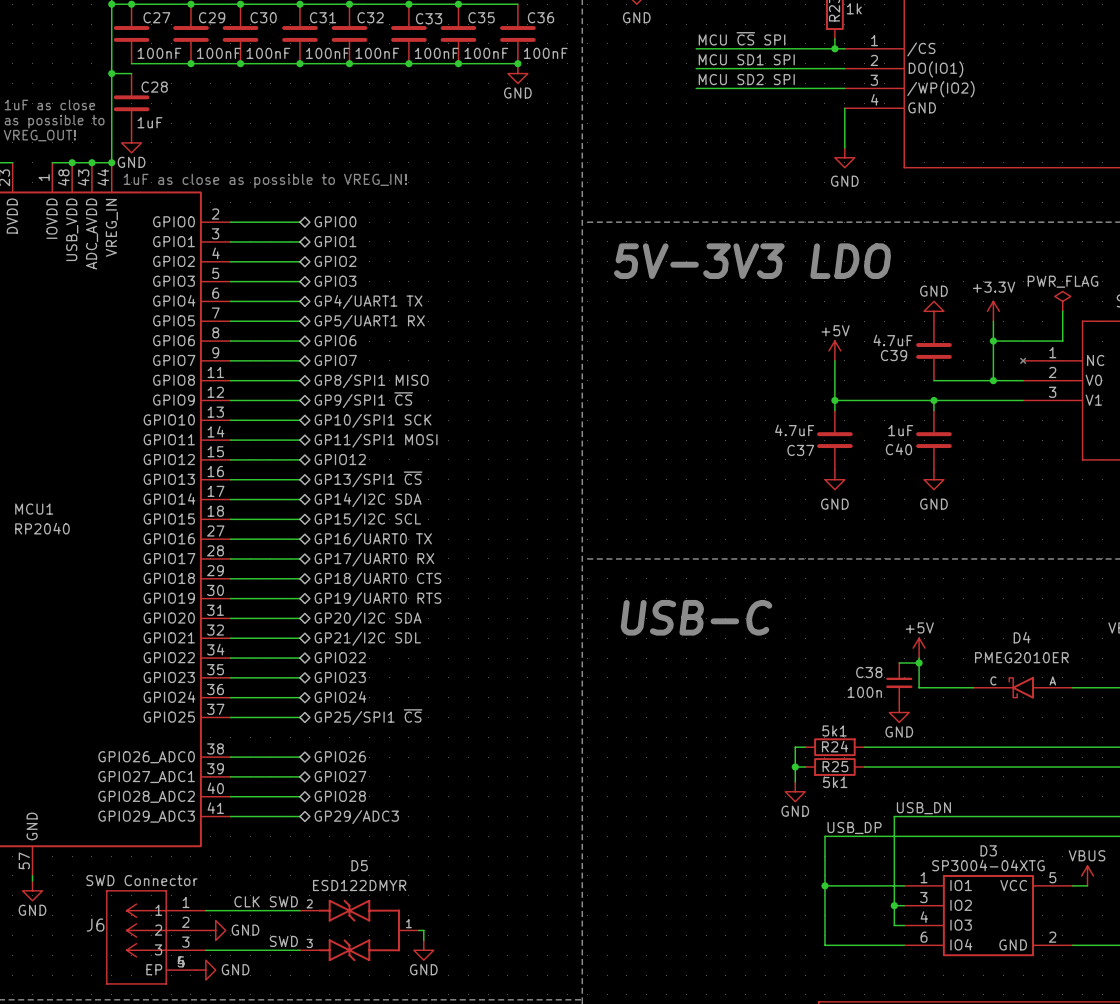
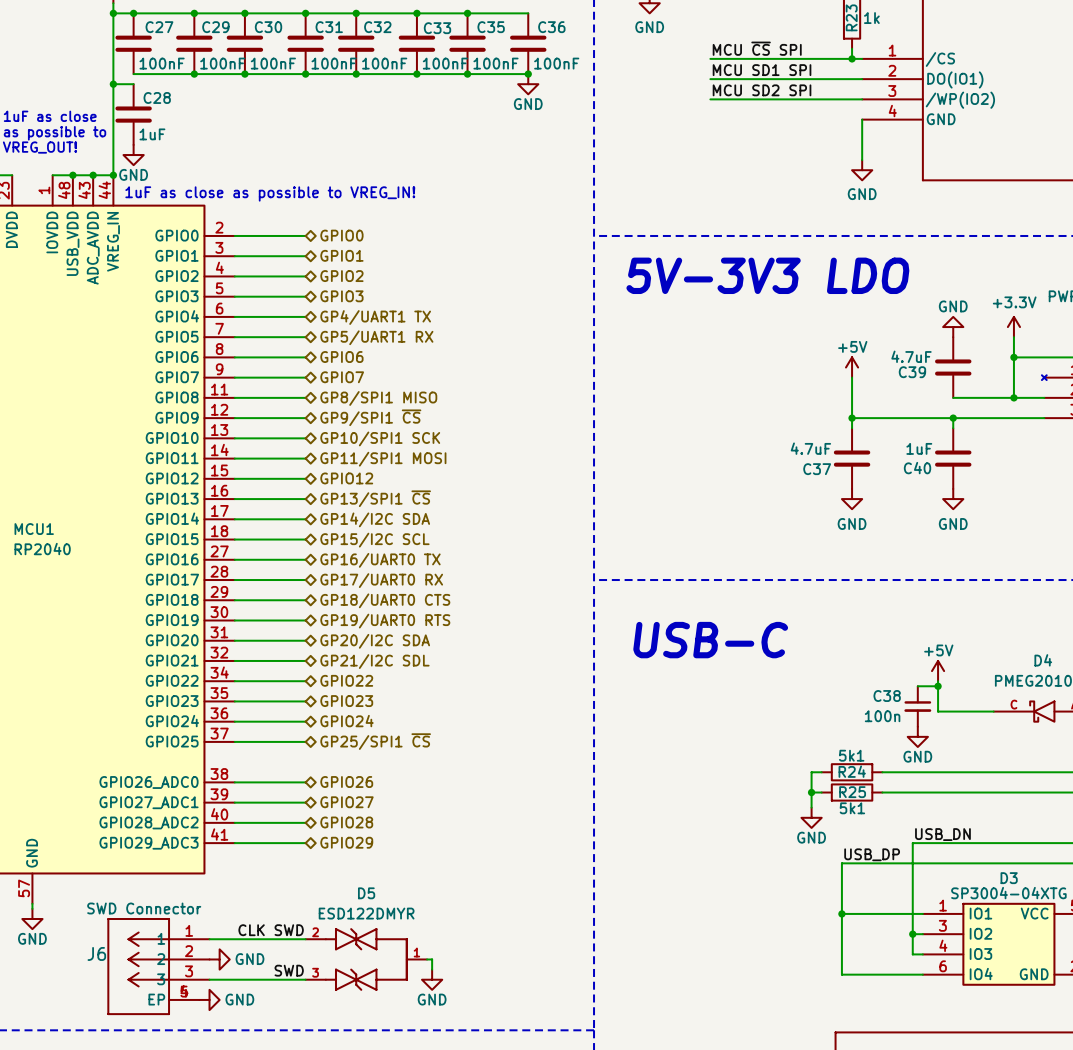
hierarchical label: GP29/ADC3 (356, 817) -> GPIO29 (346, 842)

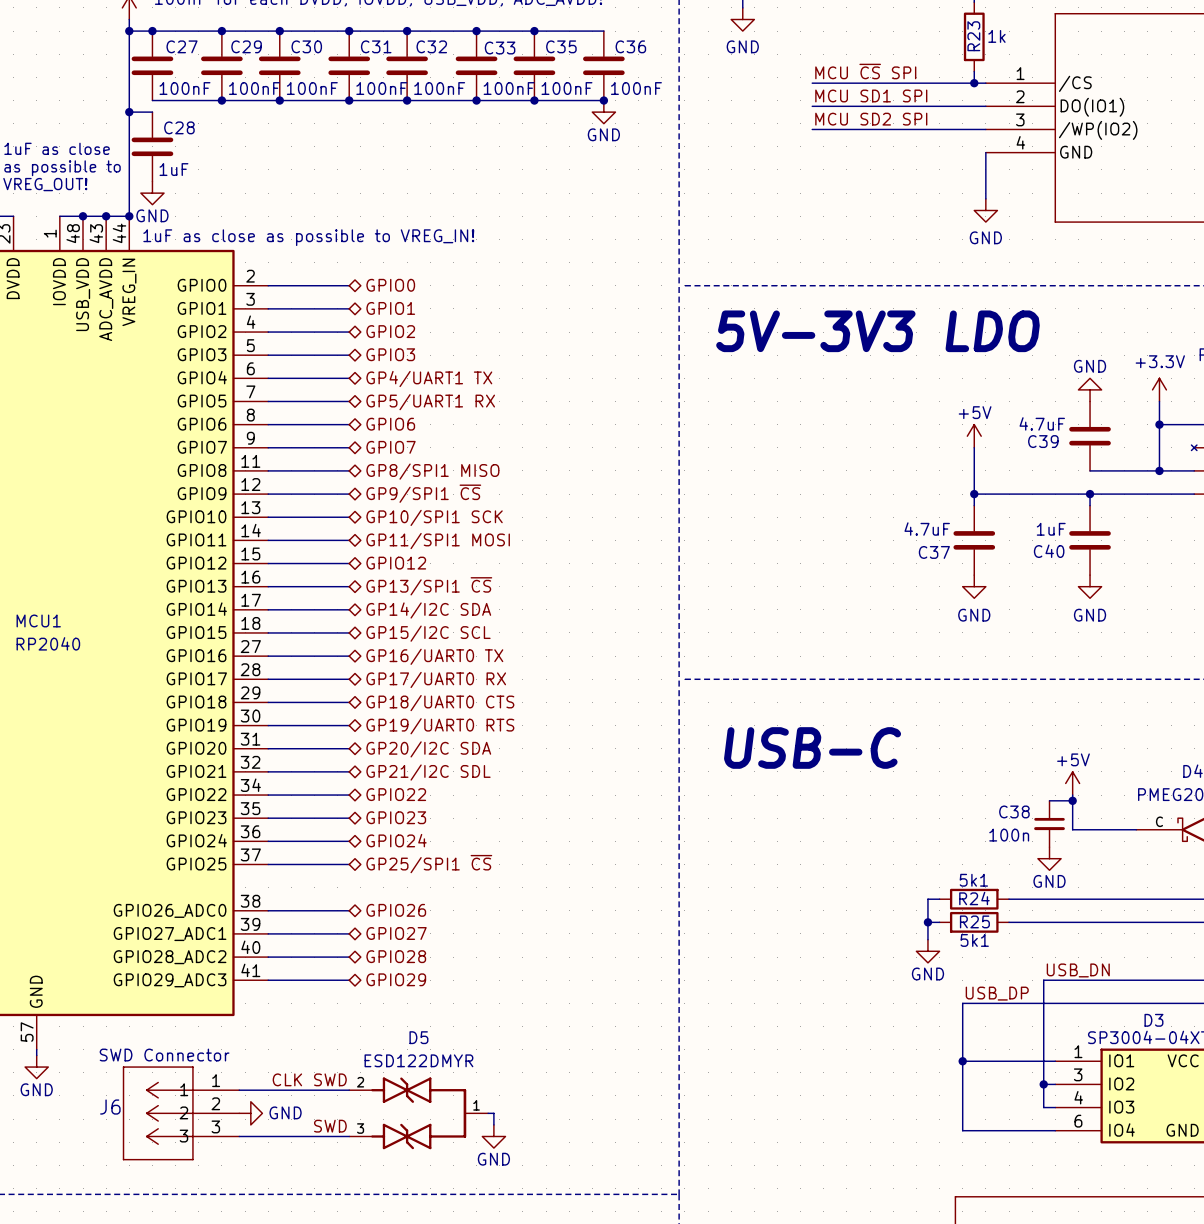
J6 symbol: [107, 918, 210, 1015] -> [122, 1066, 240, 1161]
power symbol: GND (209, 999) -> none

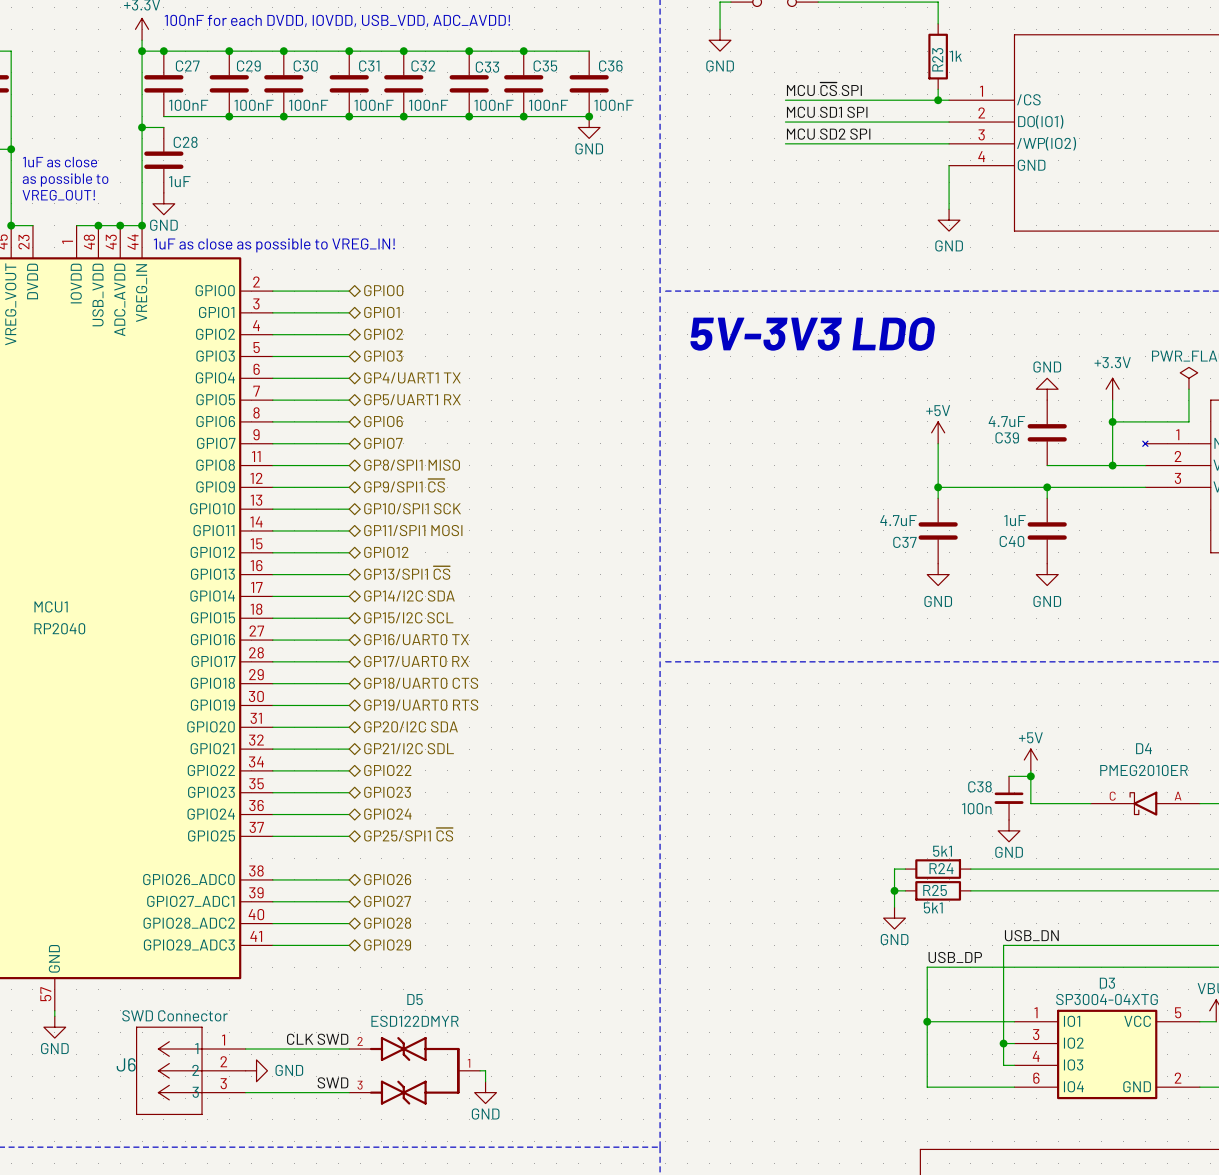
text: USB-C (812, 747) -> none

